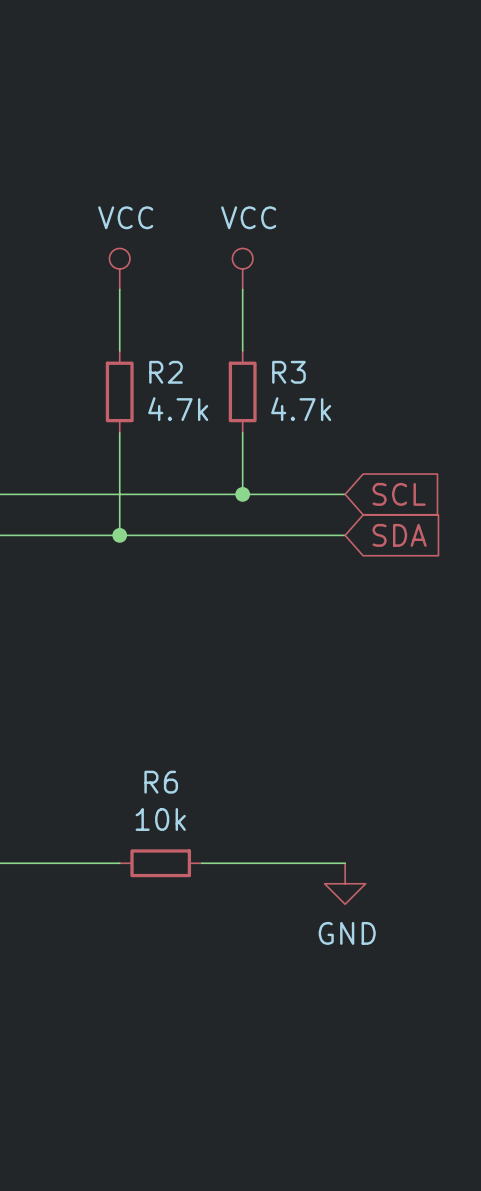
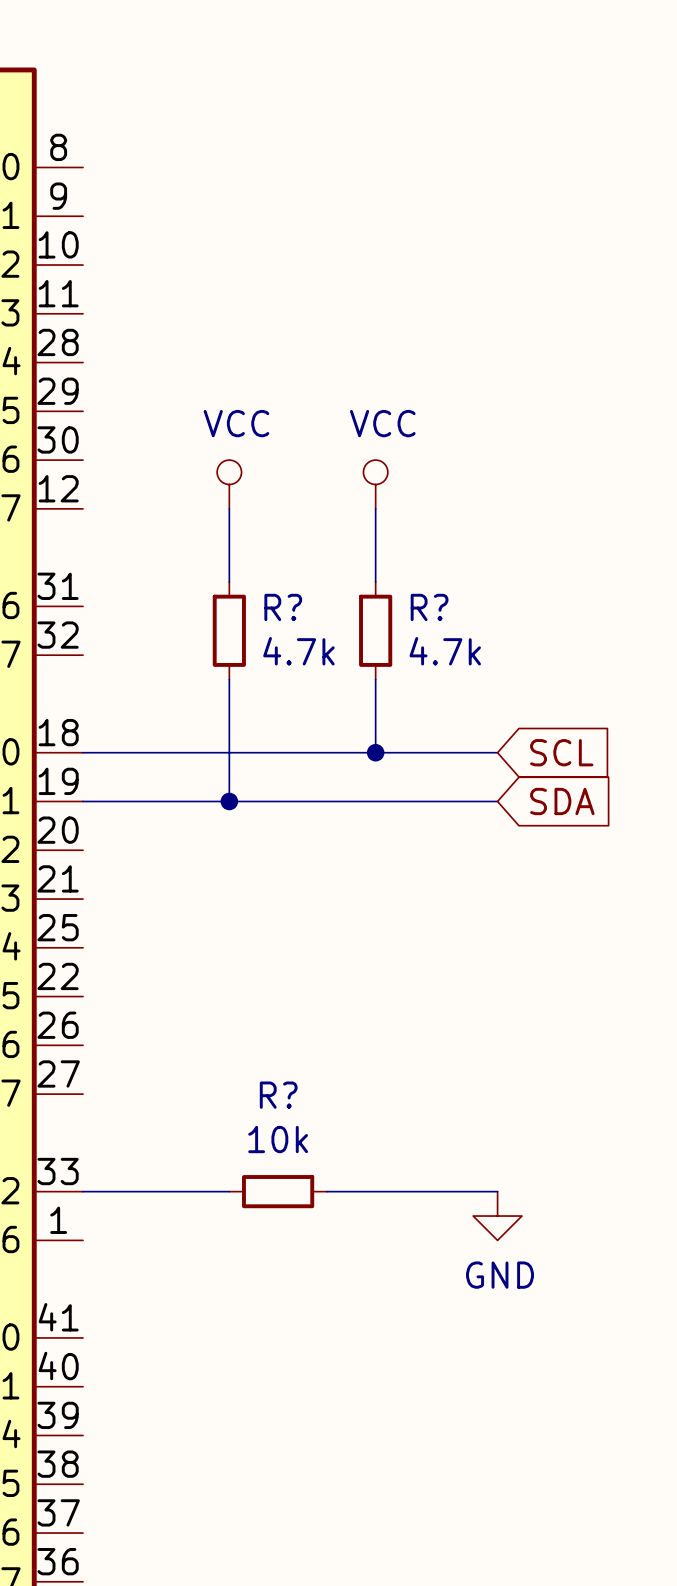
R2 name: R2 (166, 372) -> R? (283, 607)
R3 name: R3 (288, 372) -> R? (429, 607)
R6 name: R6 (161, 782) -> R? (278, 1095)

